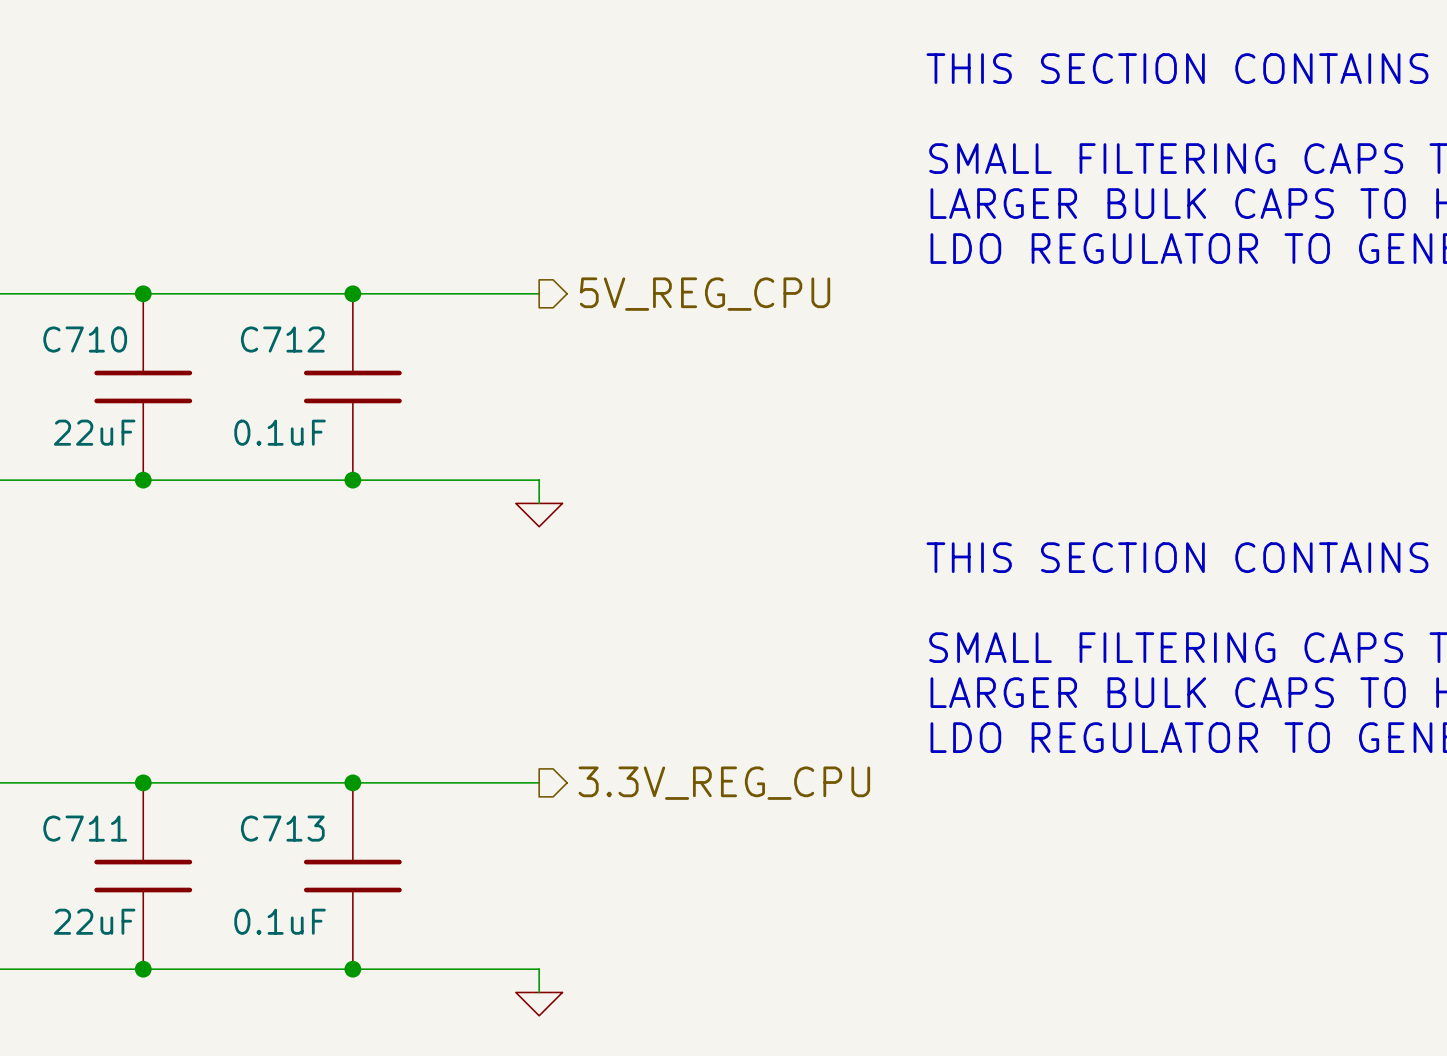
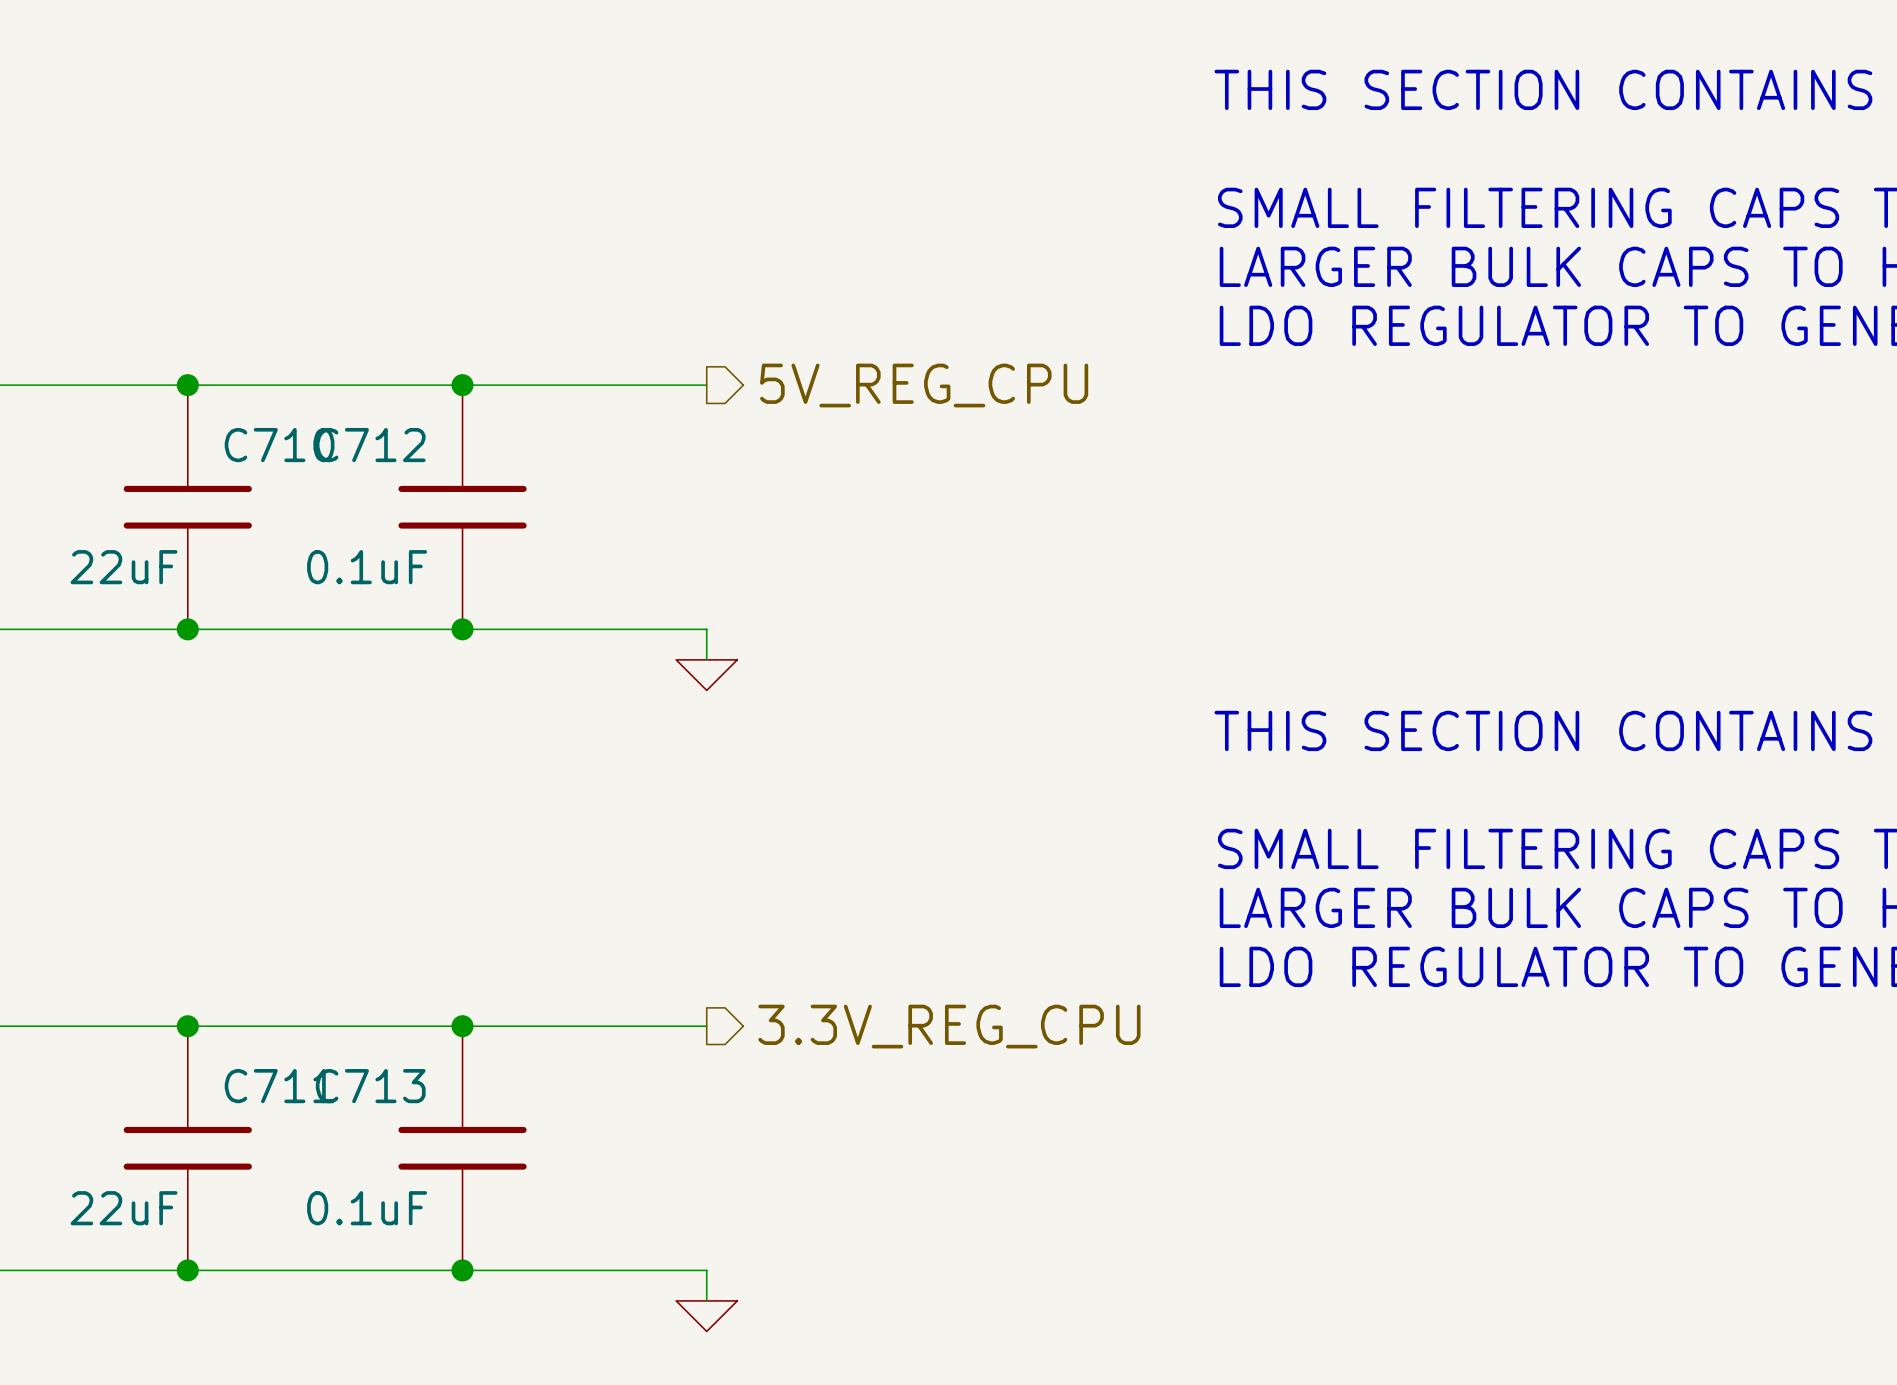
C710 name position: C710 (85, 339) -> C710 (279, 445)
C711 name position: C711 (85, 828) -> C711 (279, 1086)

